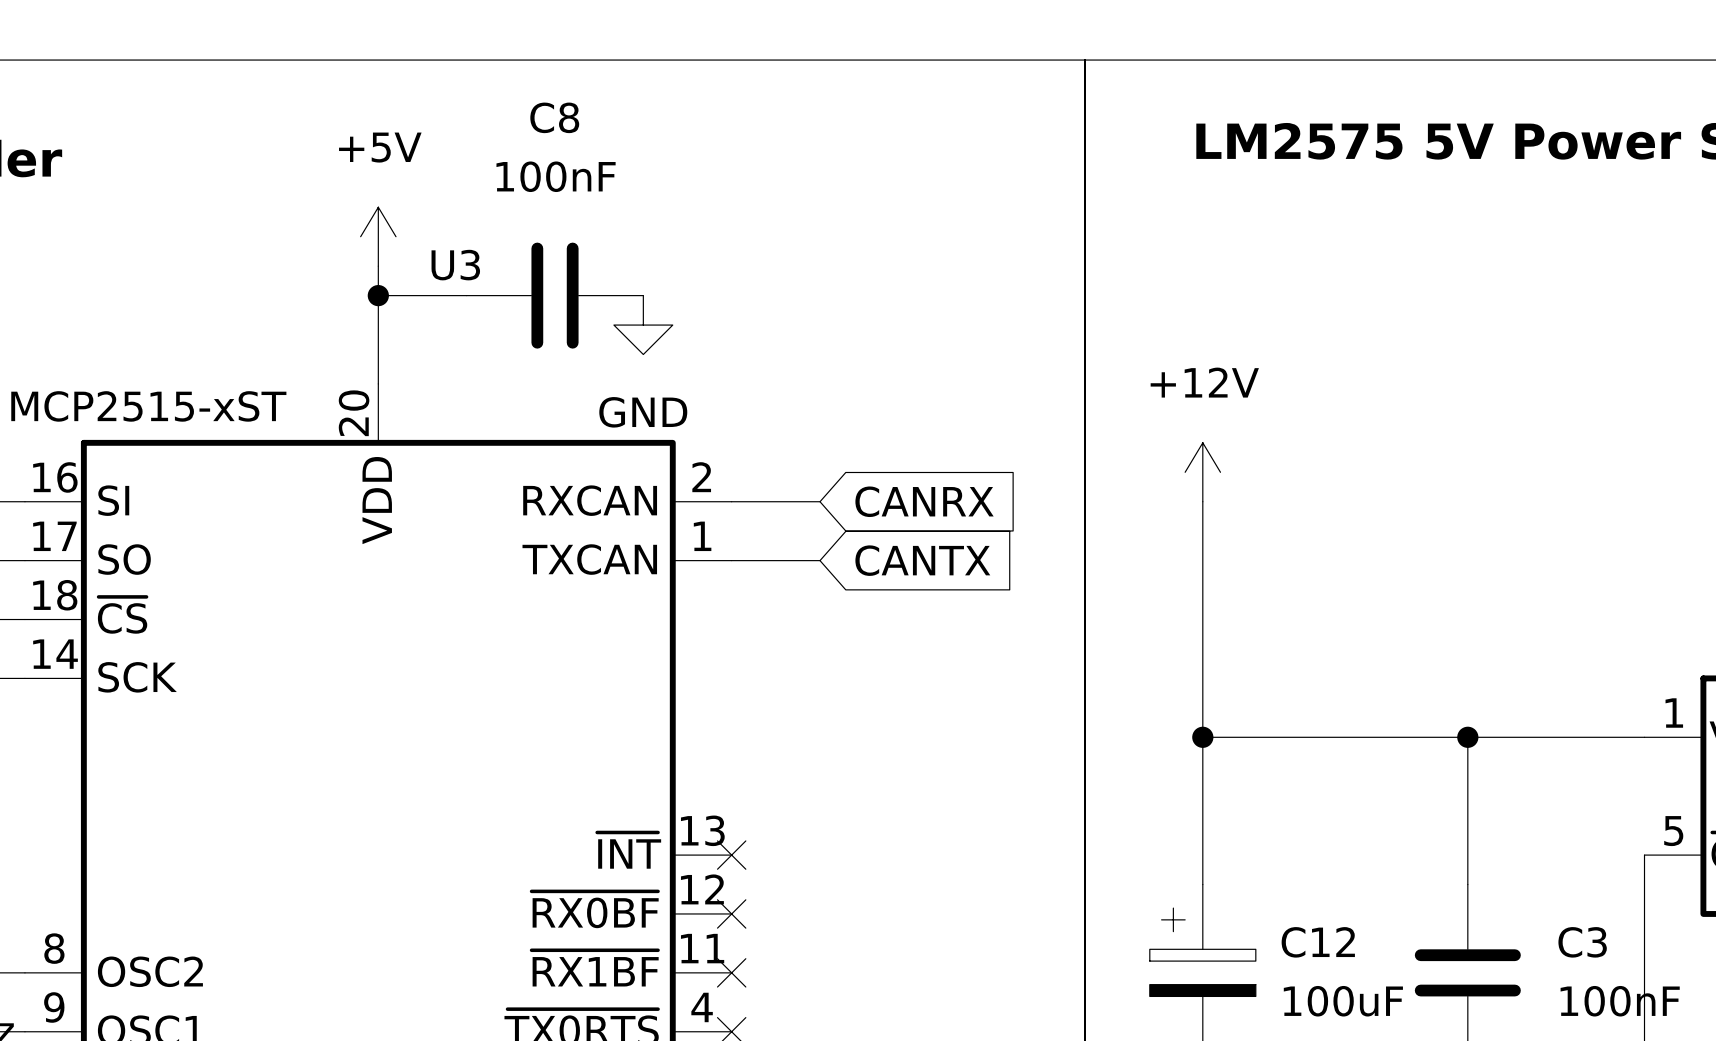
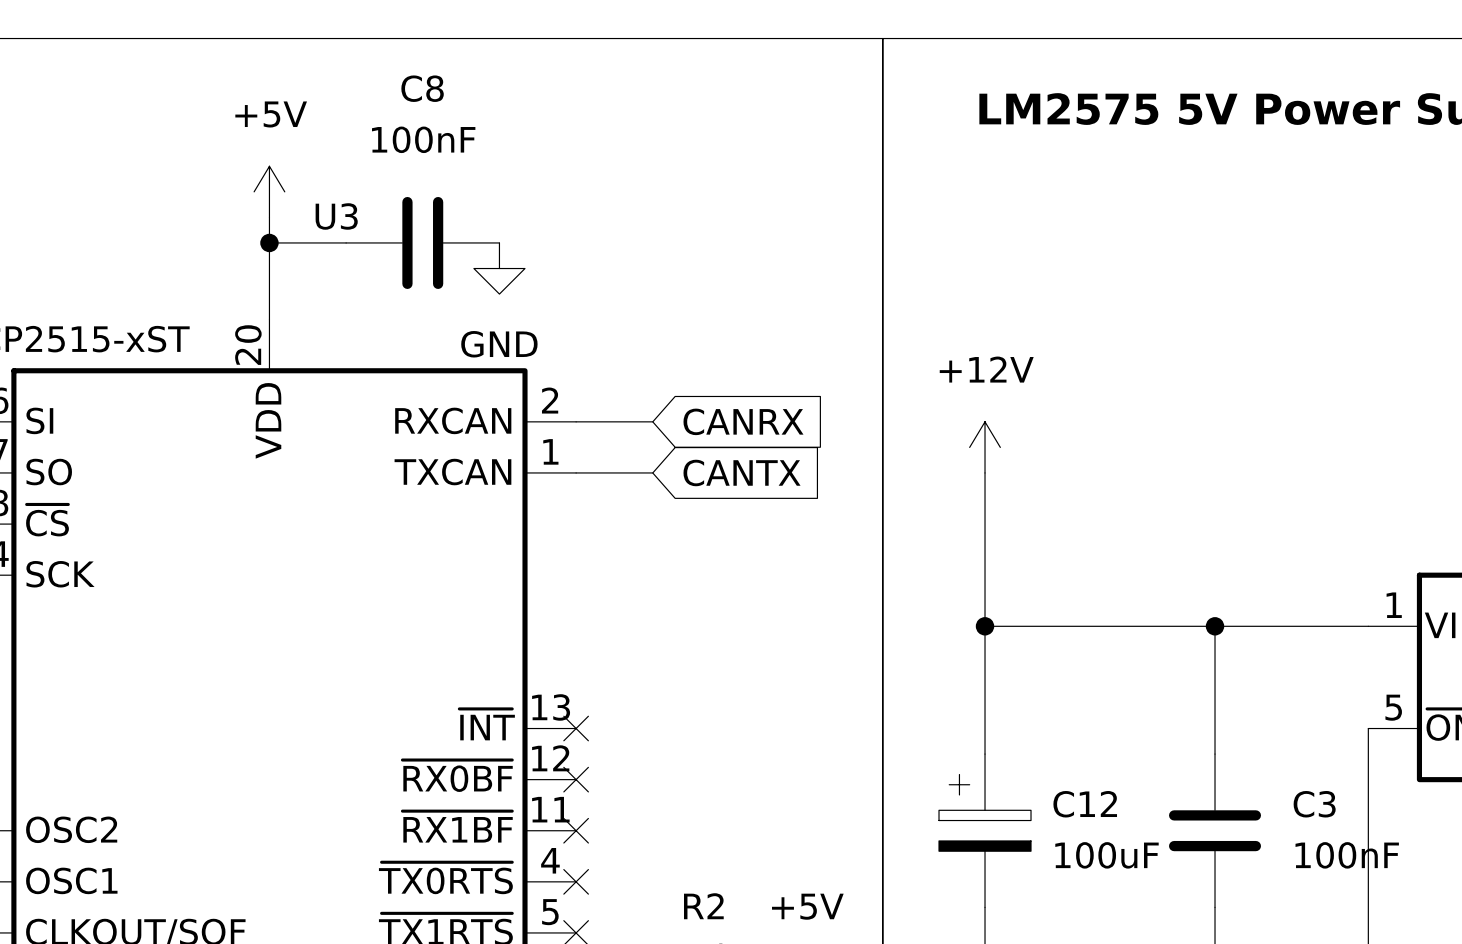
power symbol position: +12V (1202, 472) -> +12V (985, 447)

